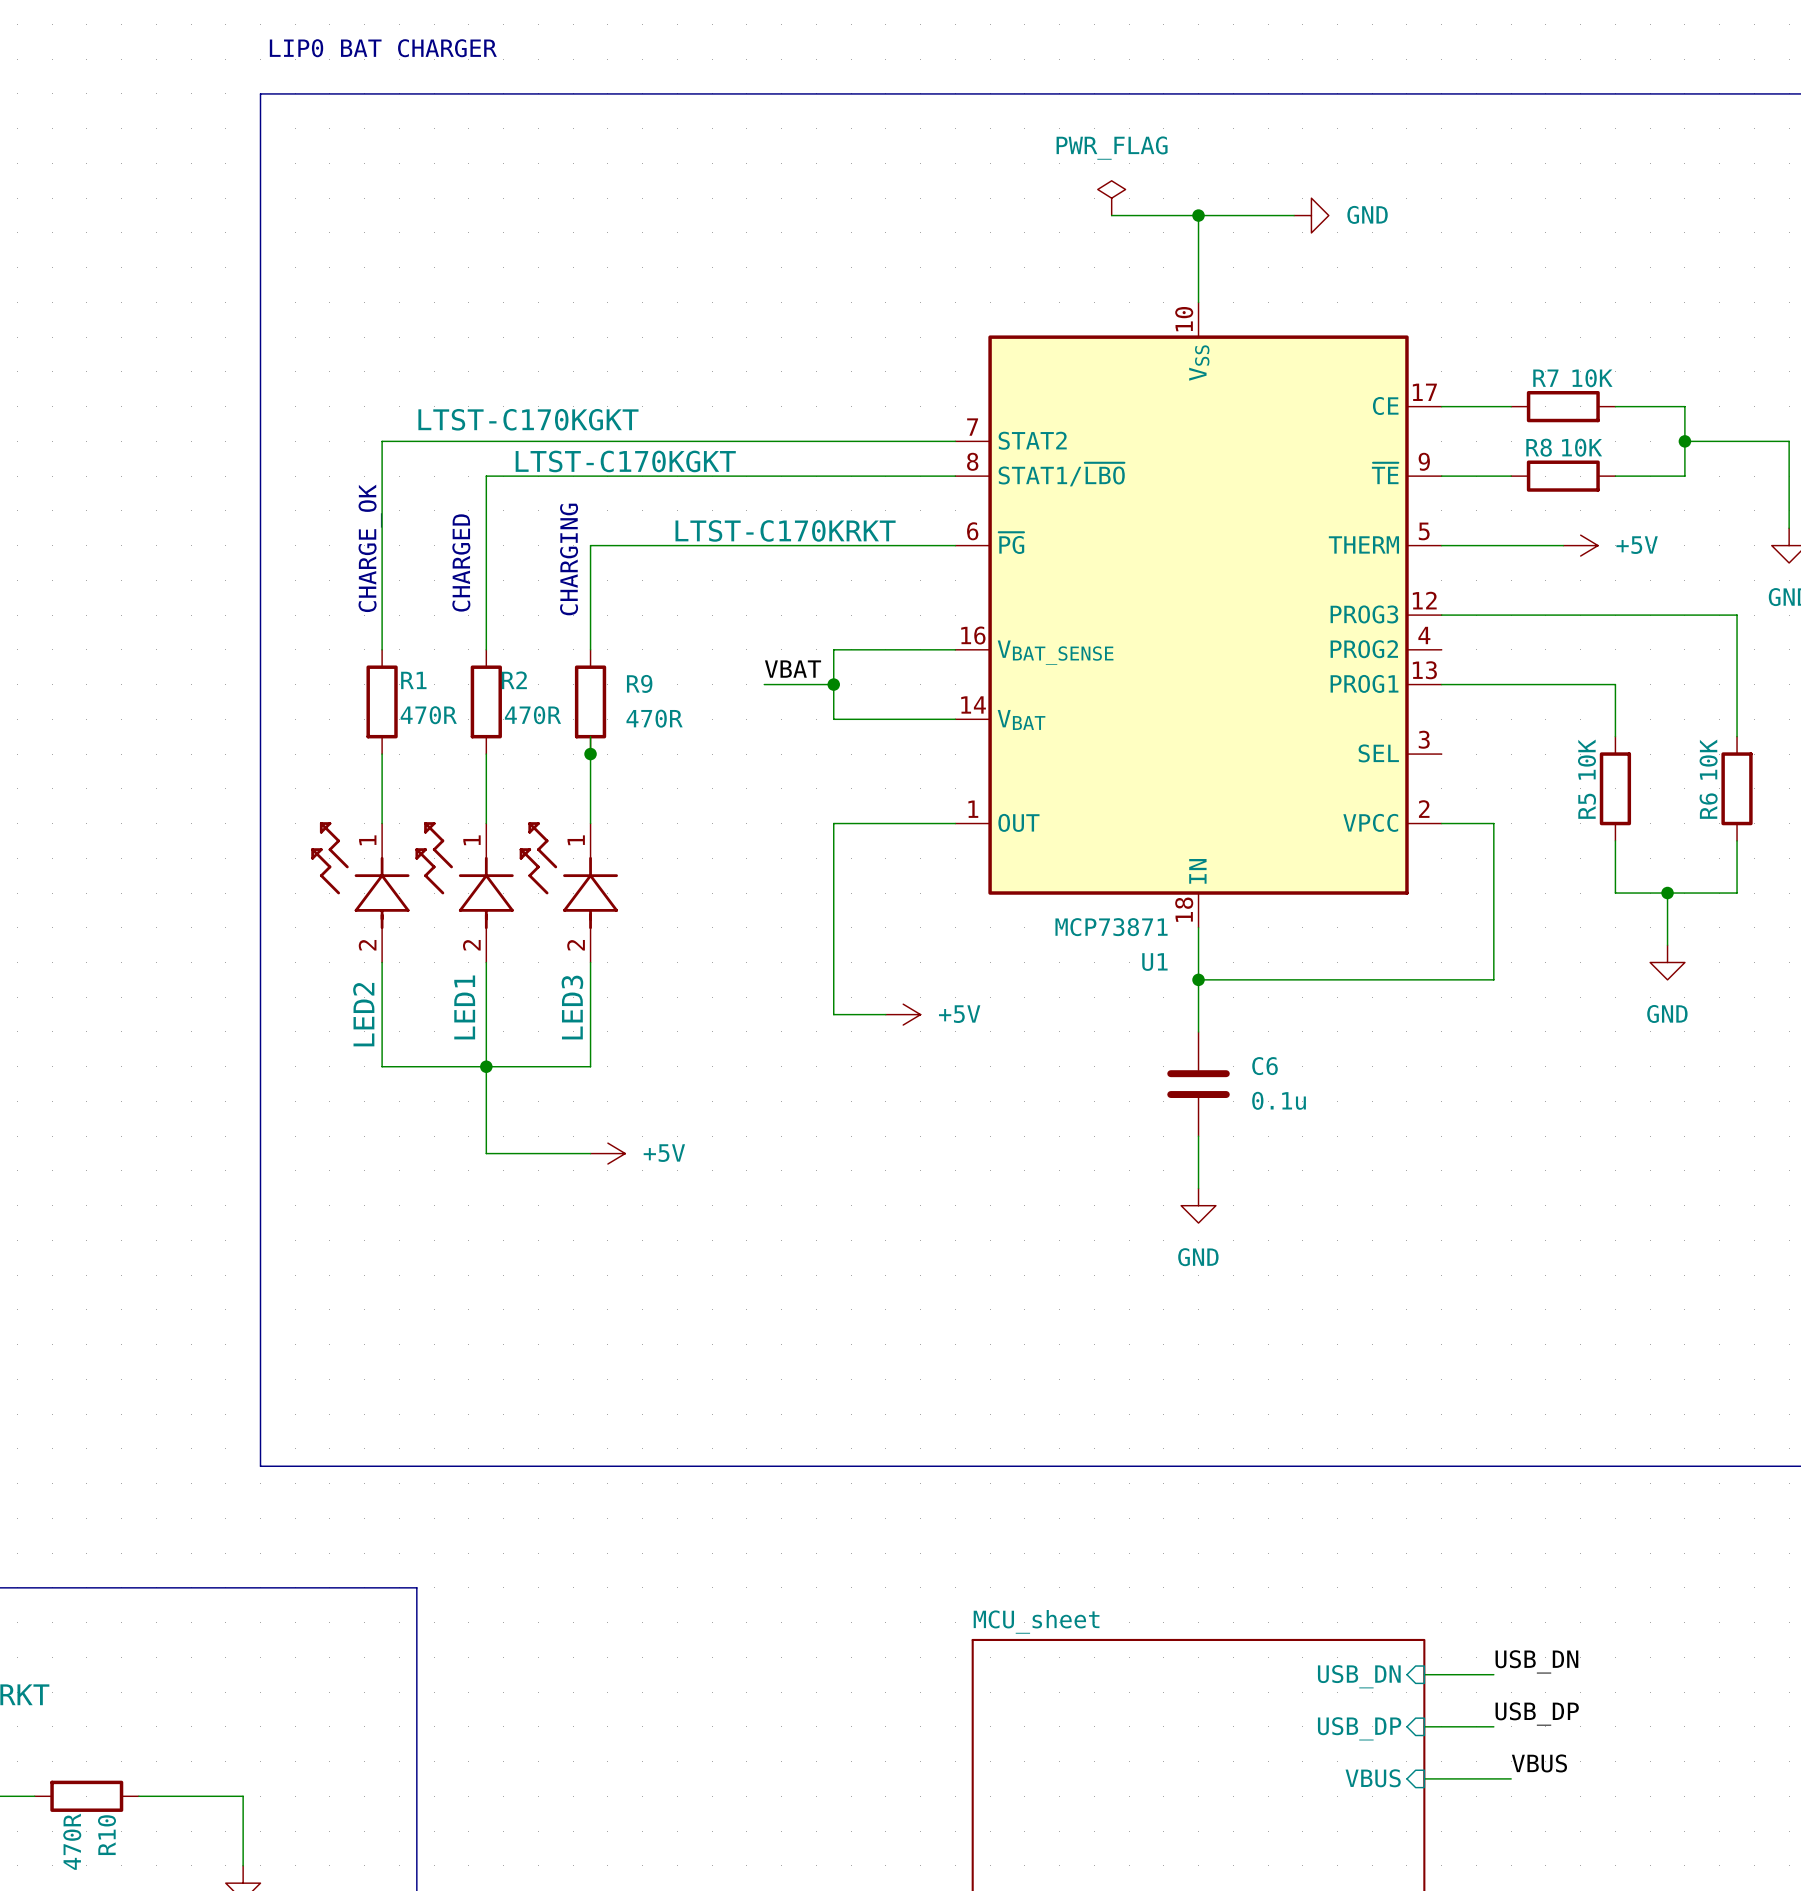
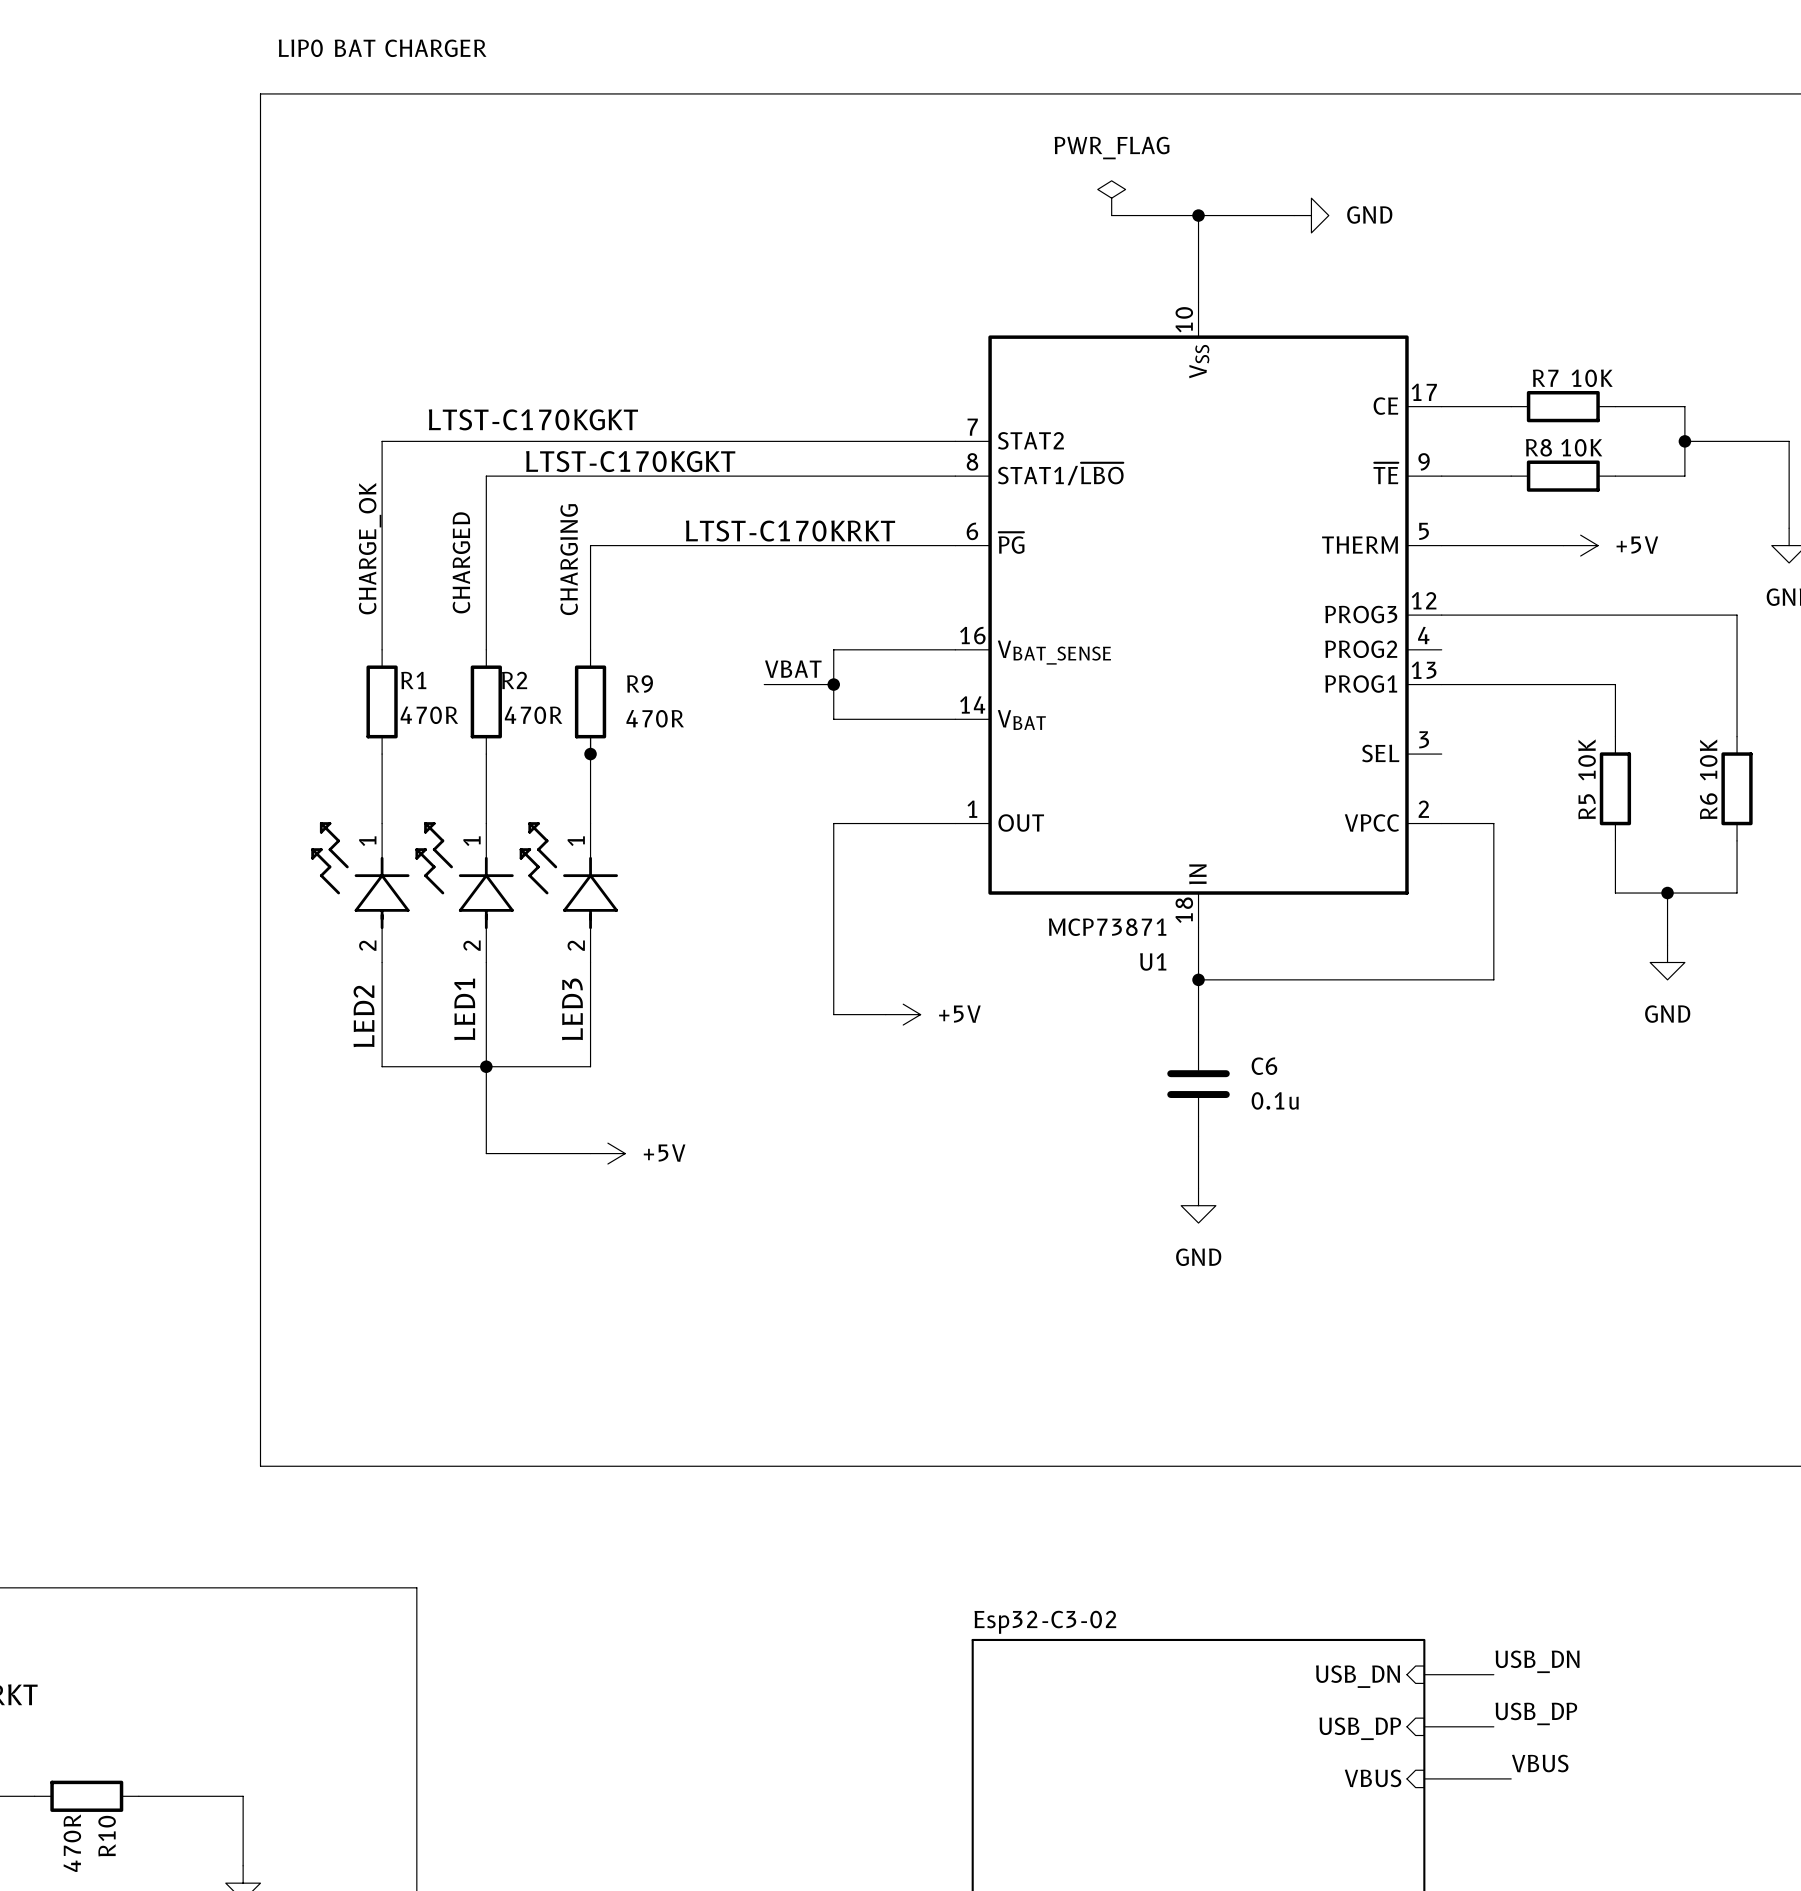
sheet MCU_sheet name: MCU_sheet (1036, 1621) -> Esp32-C3-02 (1045, 1622)

